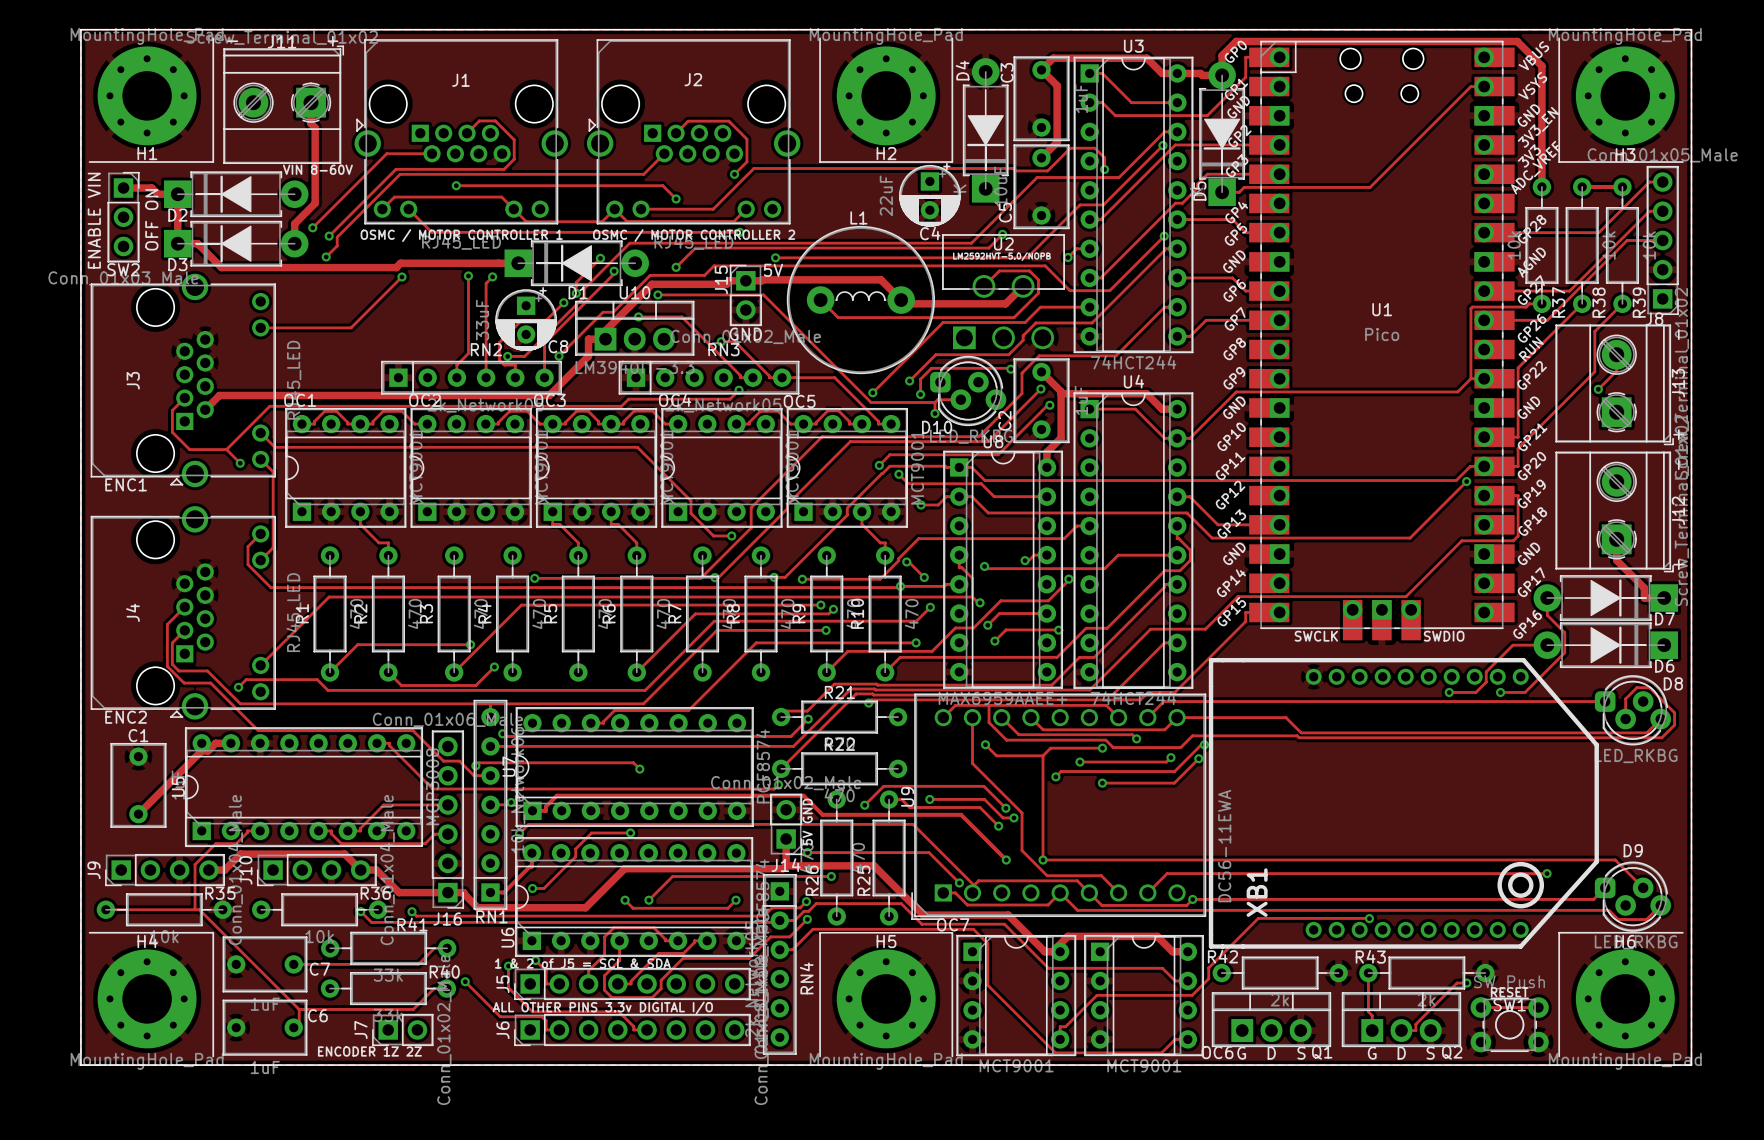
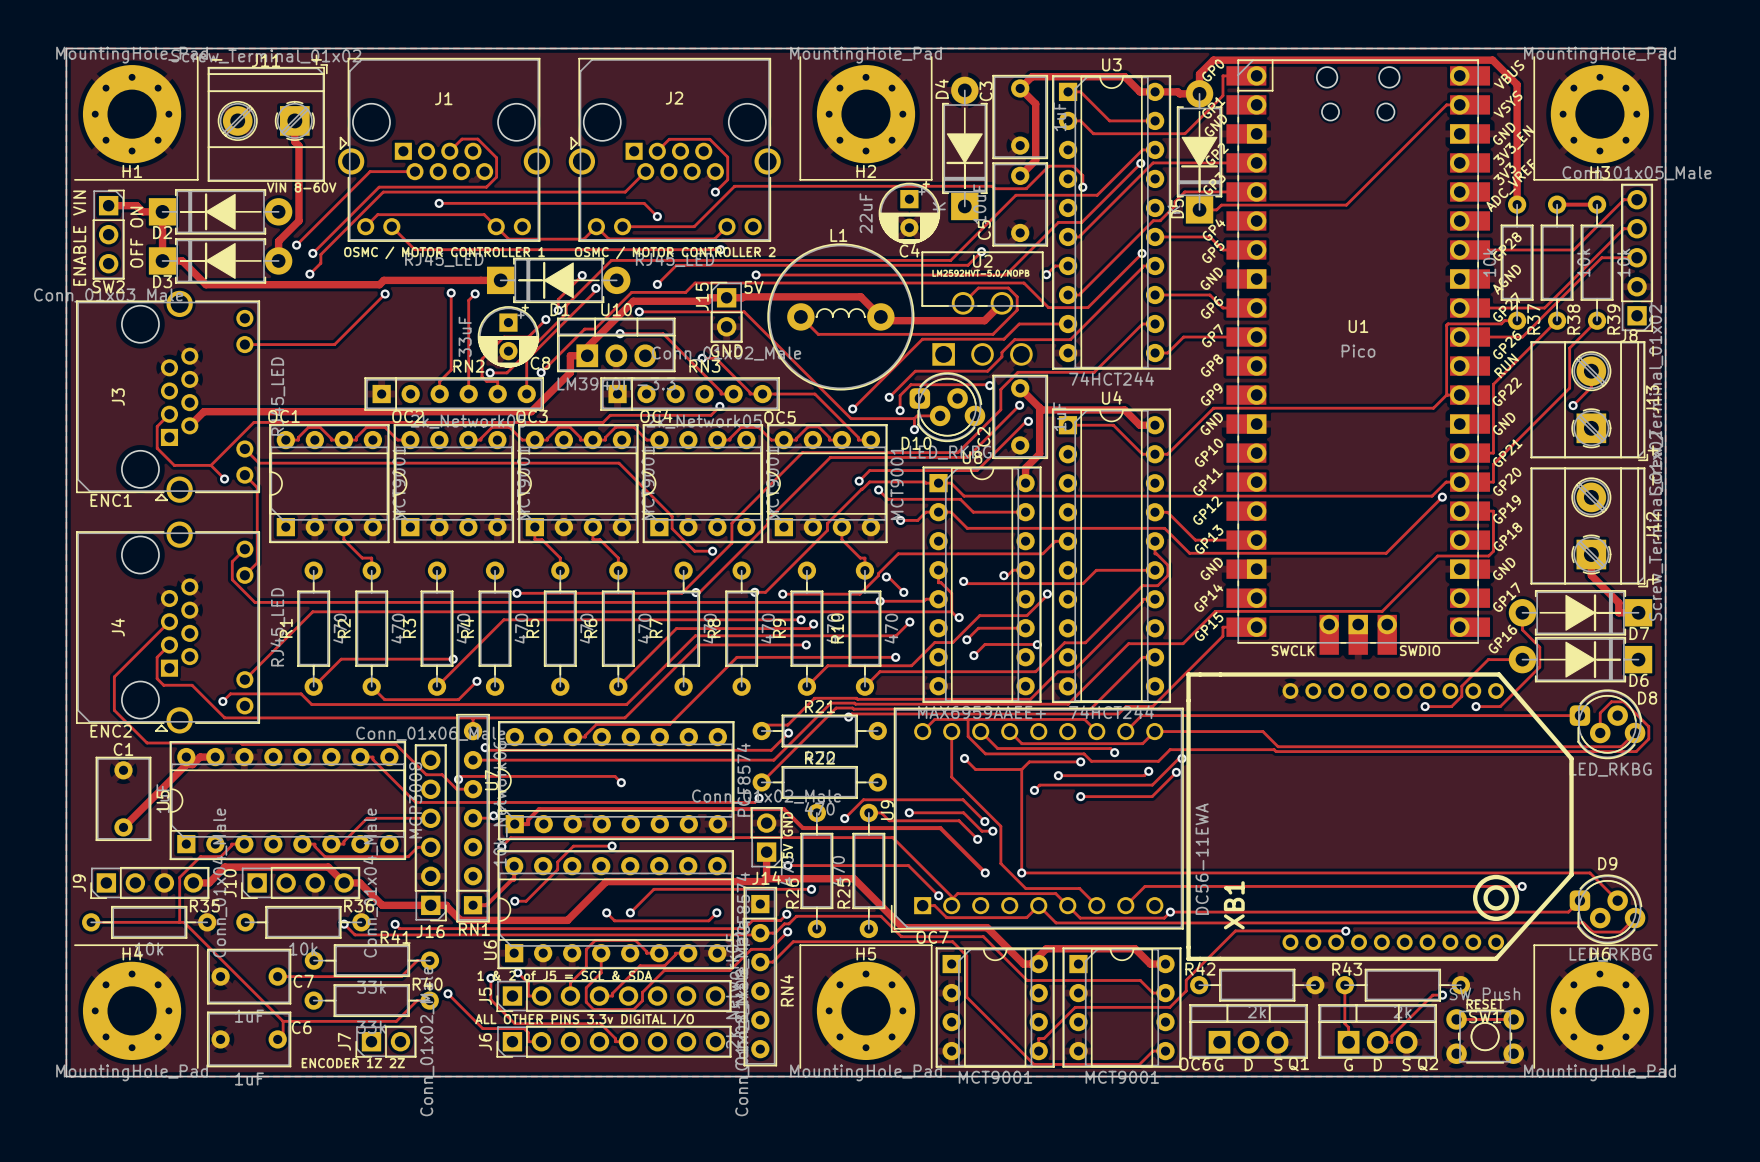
track: (167, 624) (167, 666) (184, 683) (210, 683) (256, 729) -> (152, 639) (114, 676) (114, 710) (147, 743) (240, 743)

